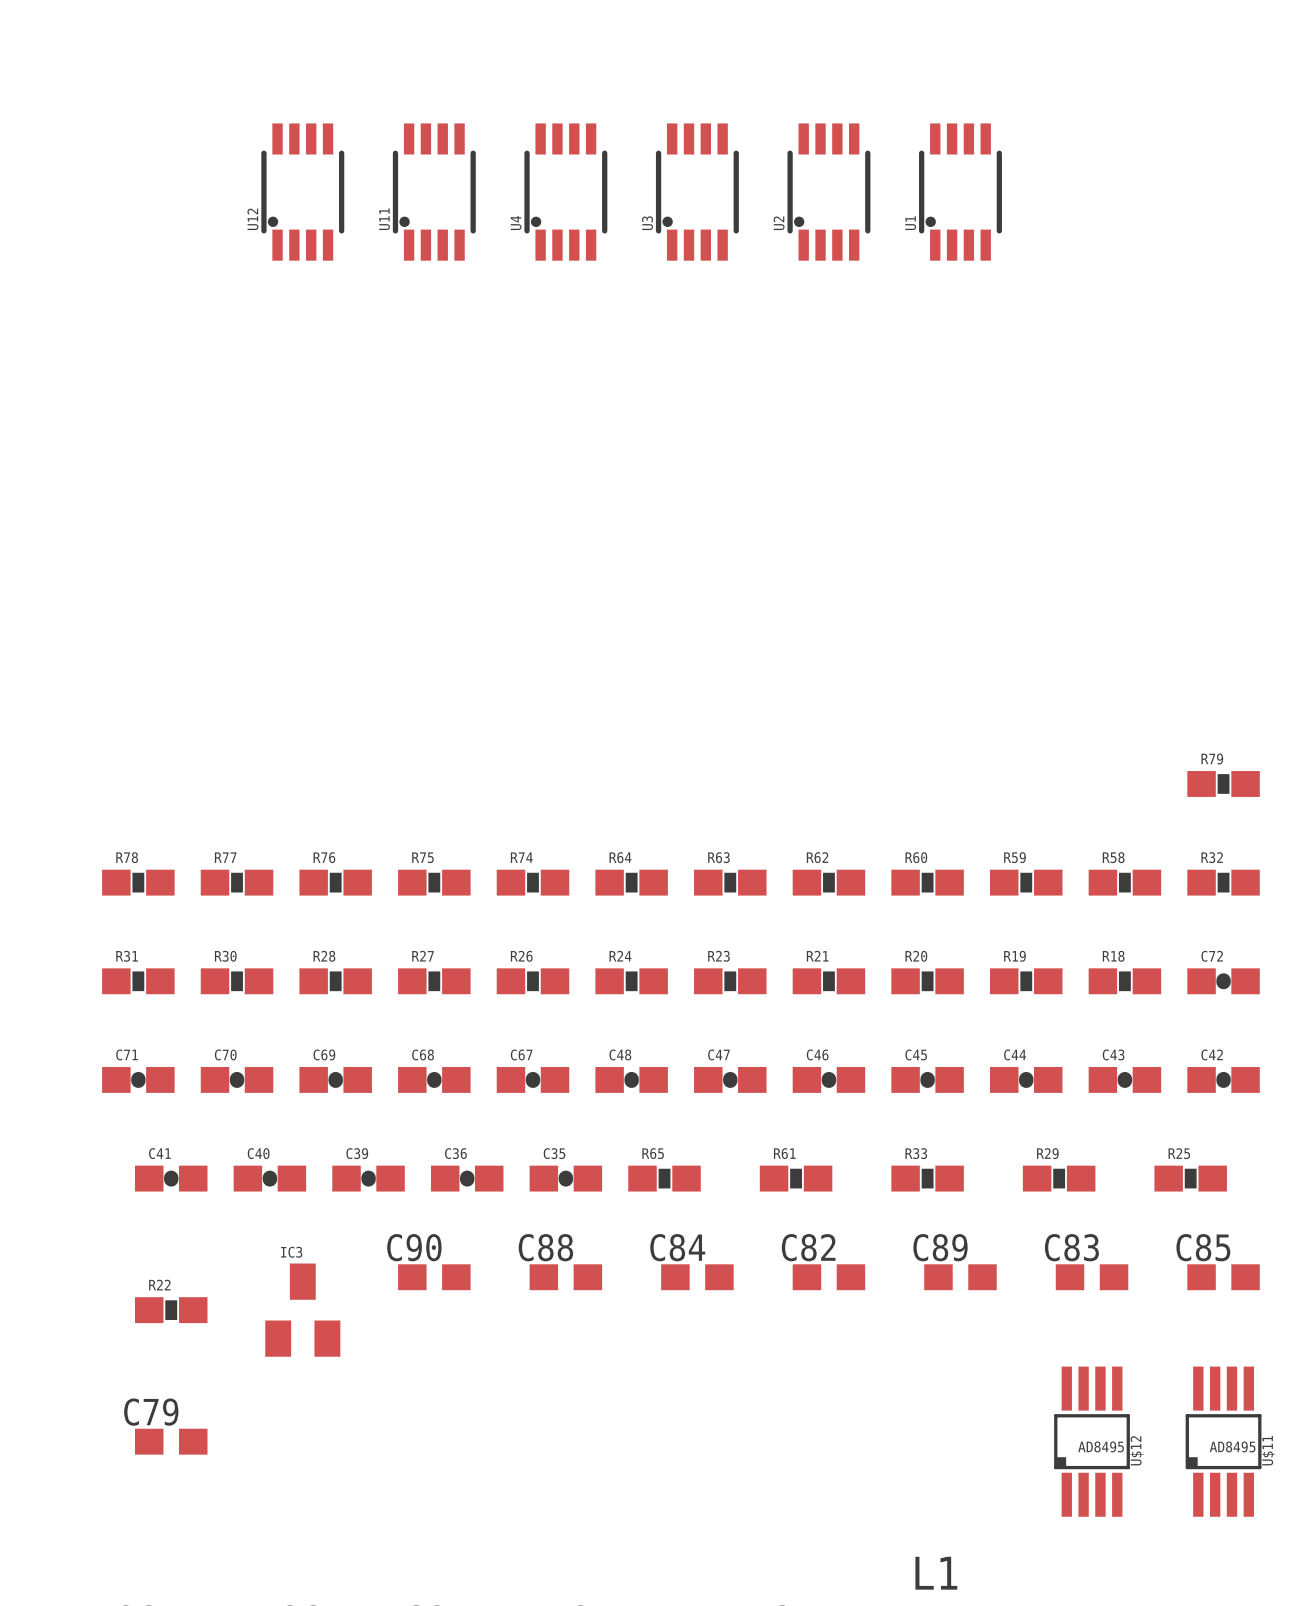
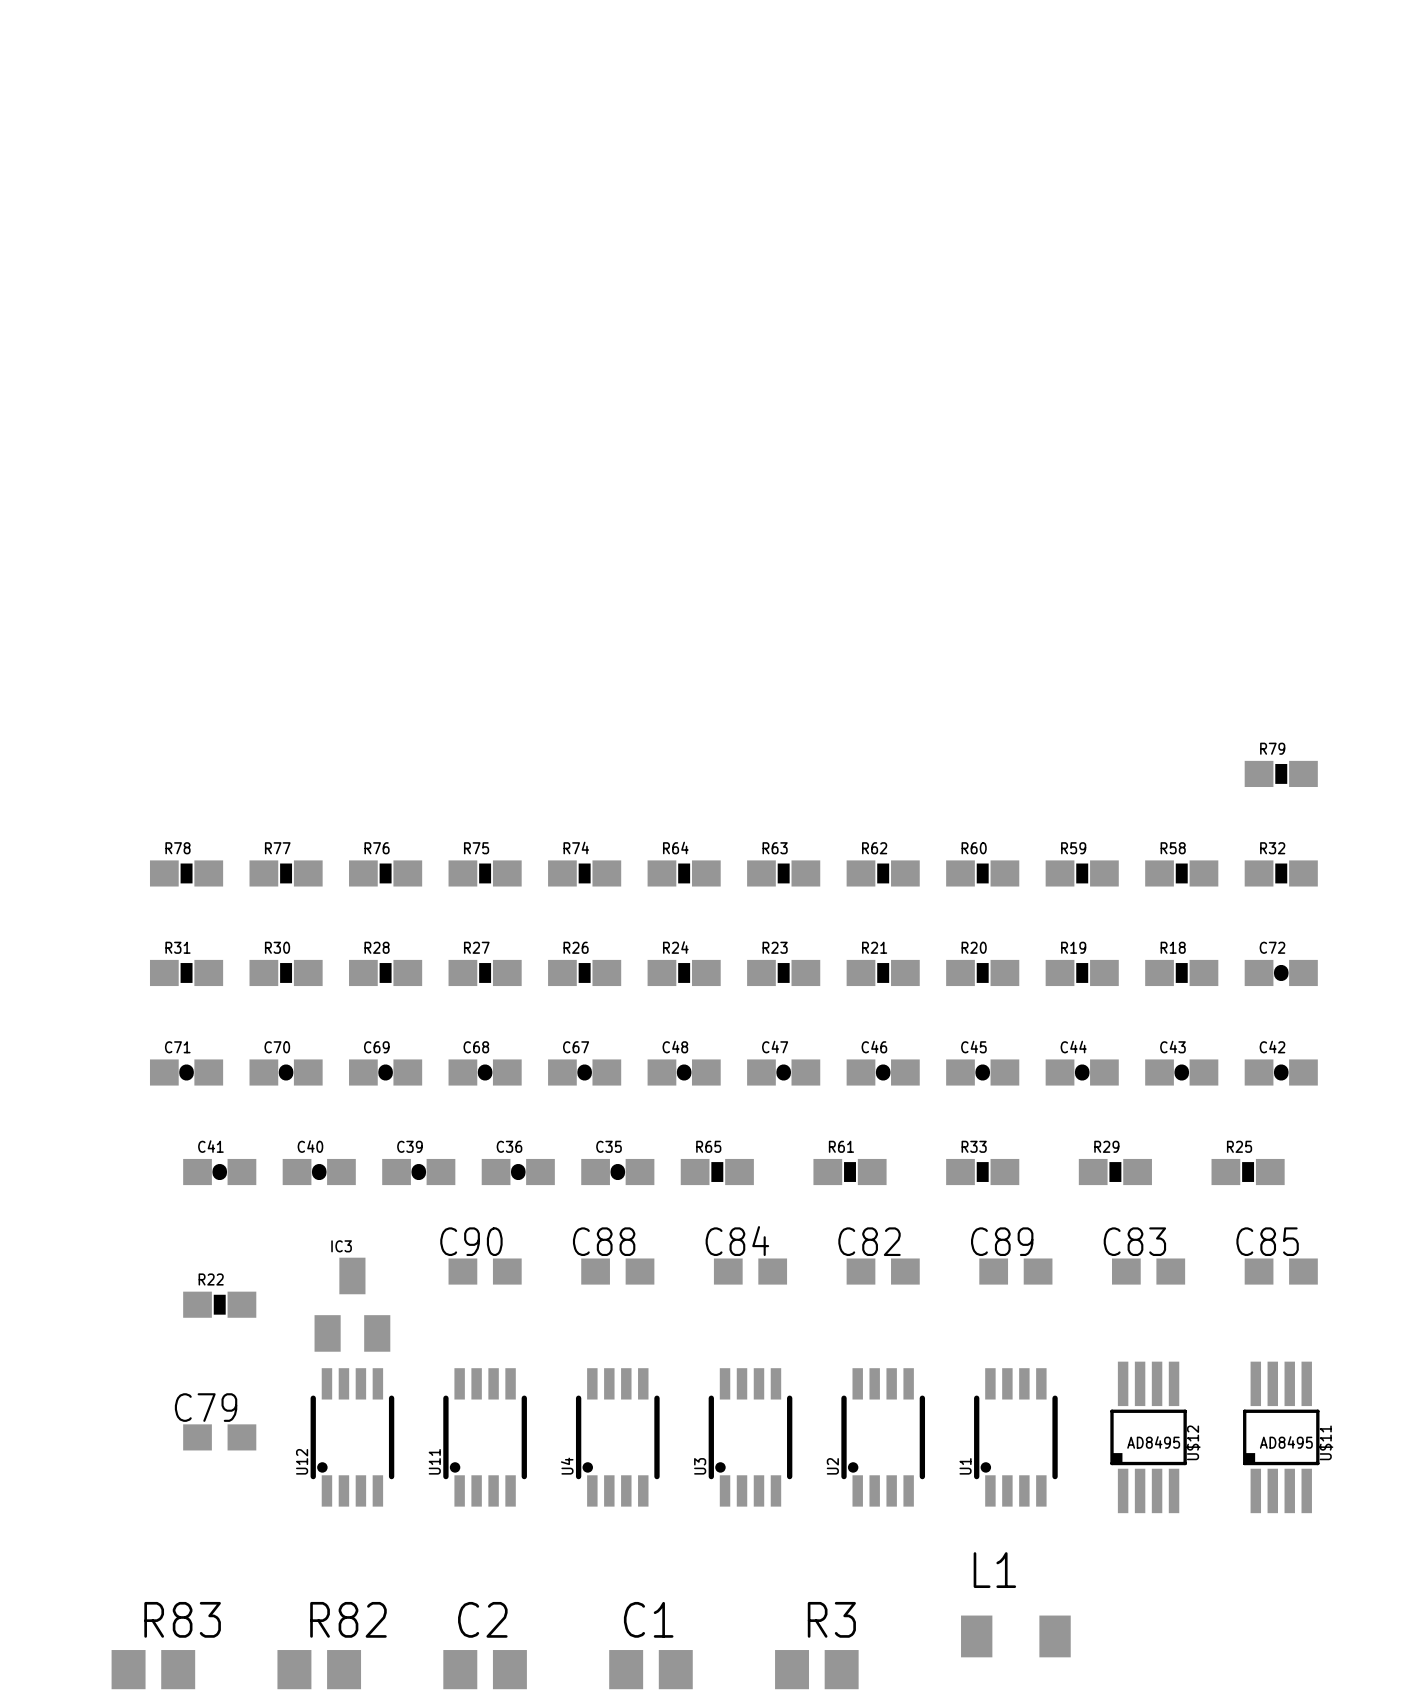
U12 position: (302, 192) -> (352, 1437)
U11 position: (434, 192) -> (485, 1437)
U4 position: (565, 192) -> (617, 1437)
U3 position: (697, 192) -> (750, 1437)
U2 position: (828, 192) -> (883, 1437)
U1 position: (960, 192) -> (1015, 1437)

